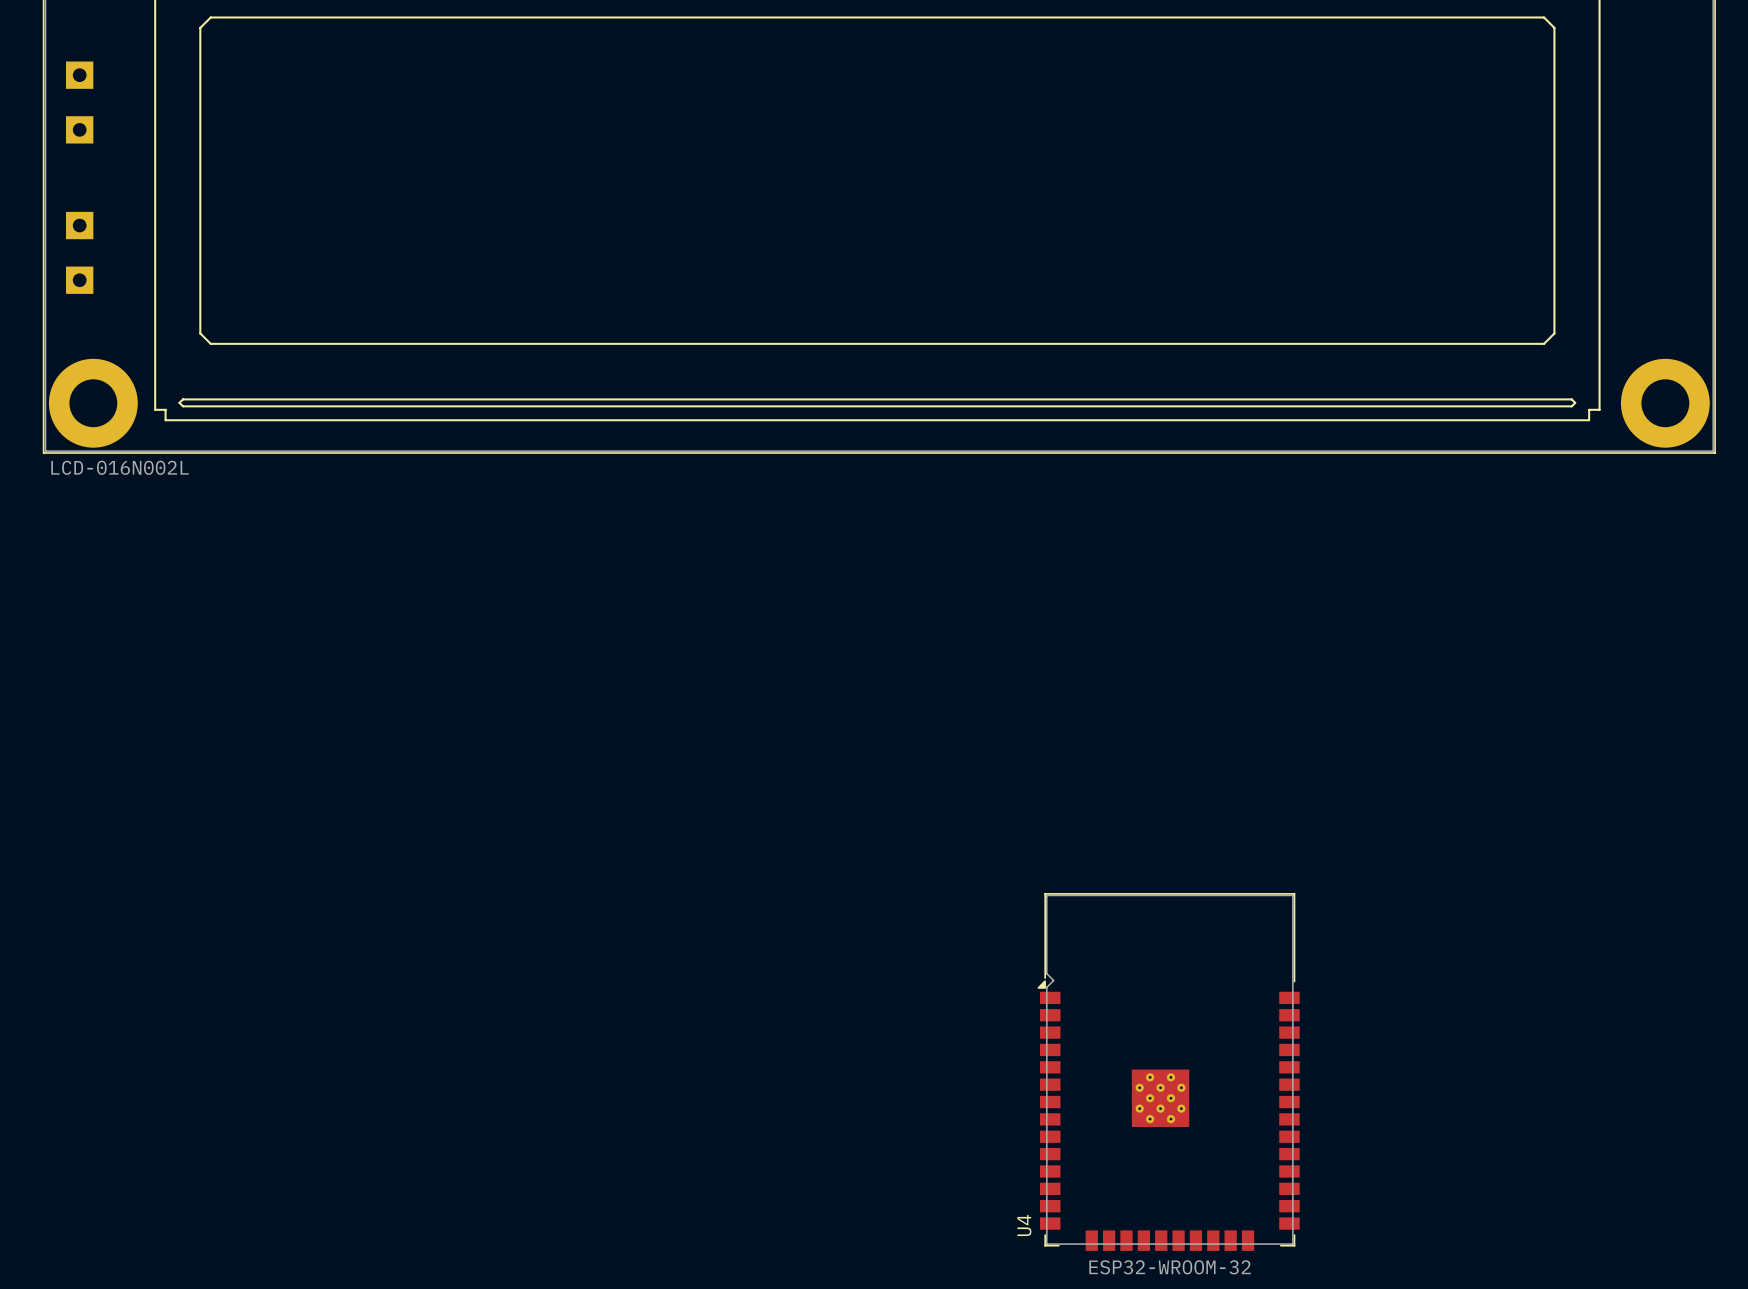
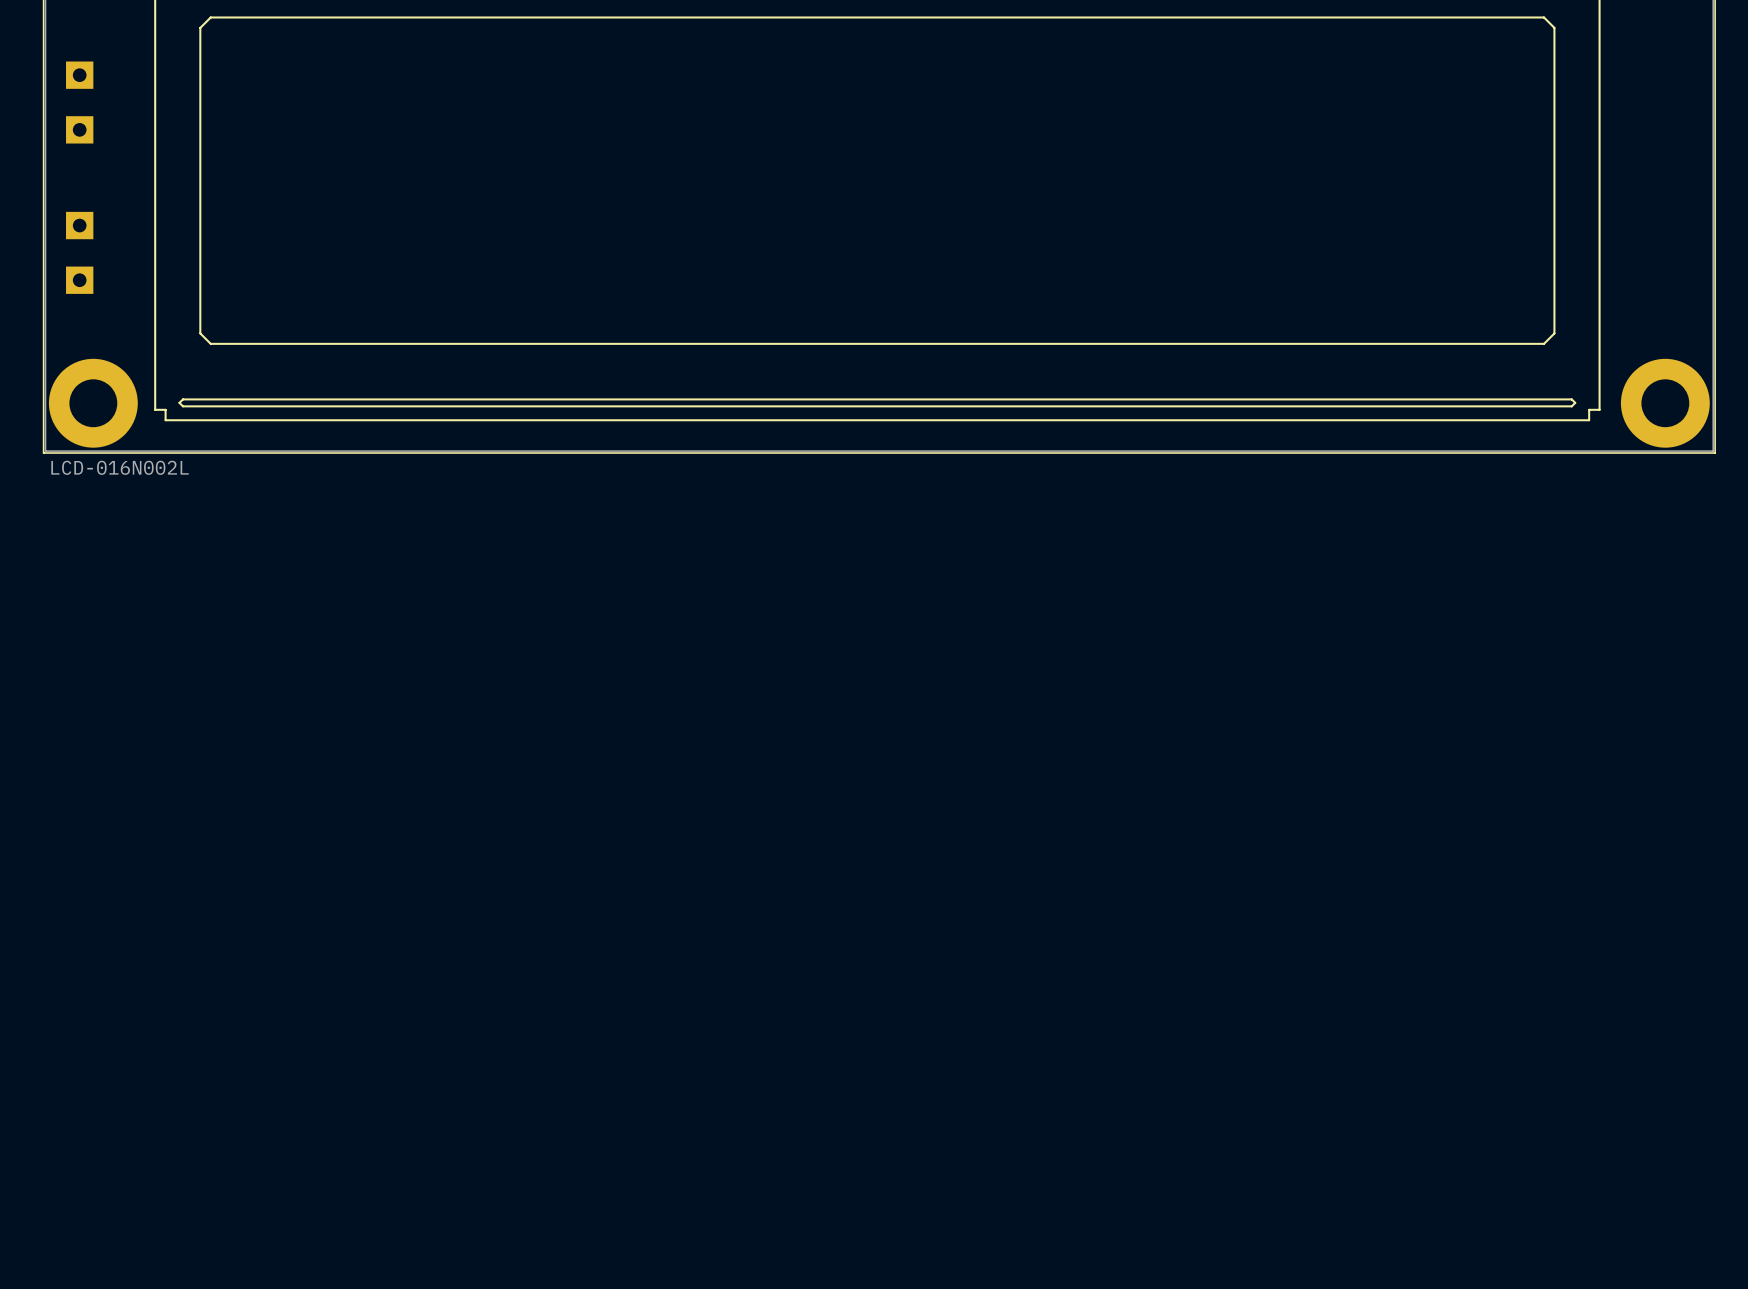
U4: ESP32-WROOM-32 (1168, 1071) -> none

